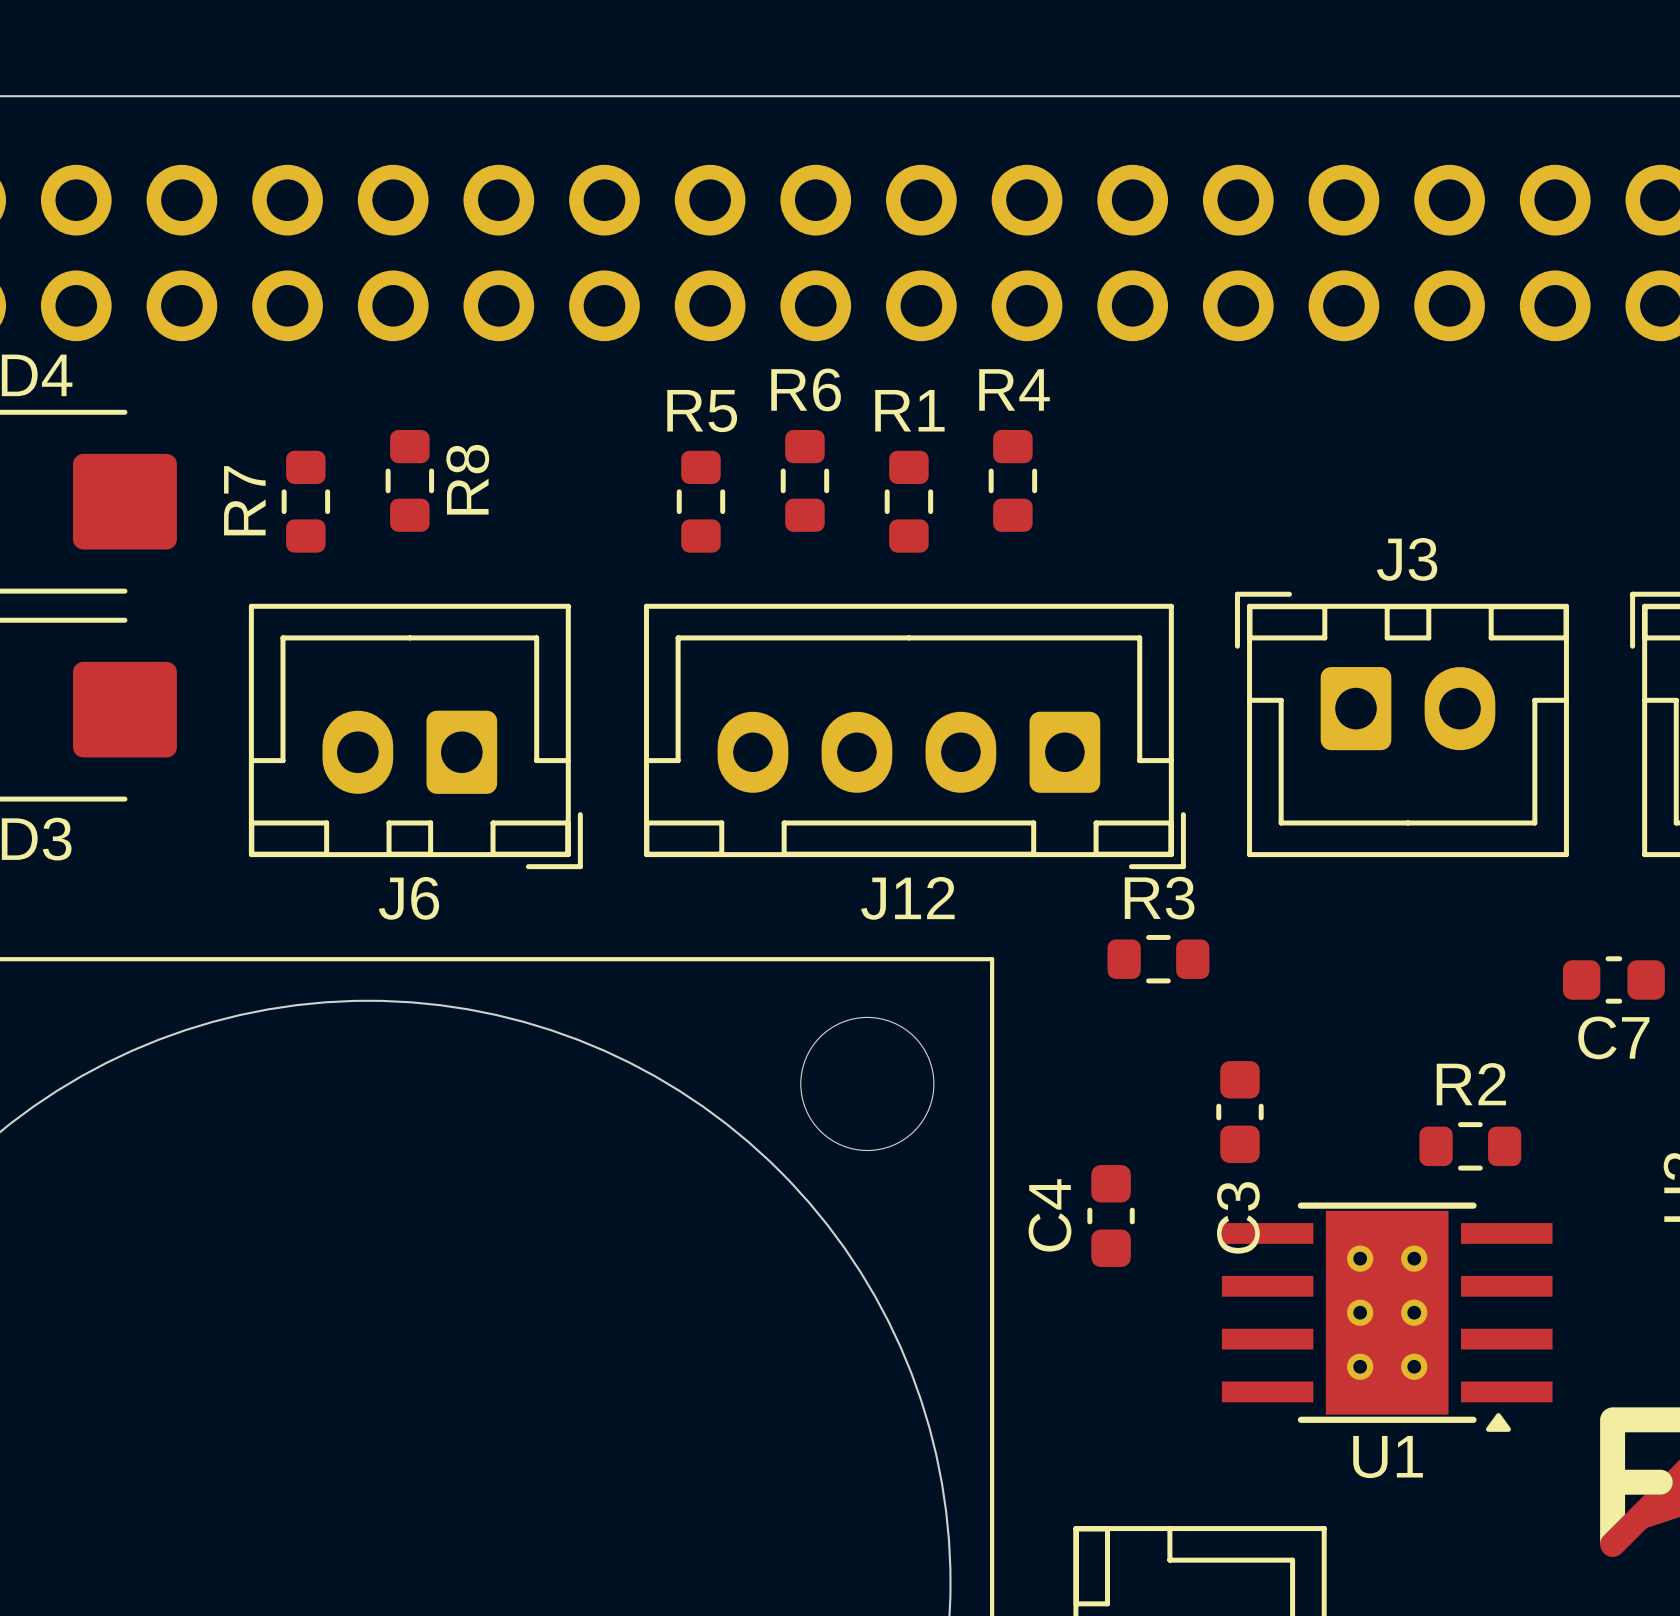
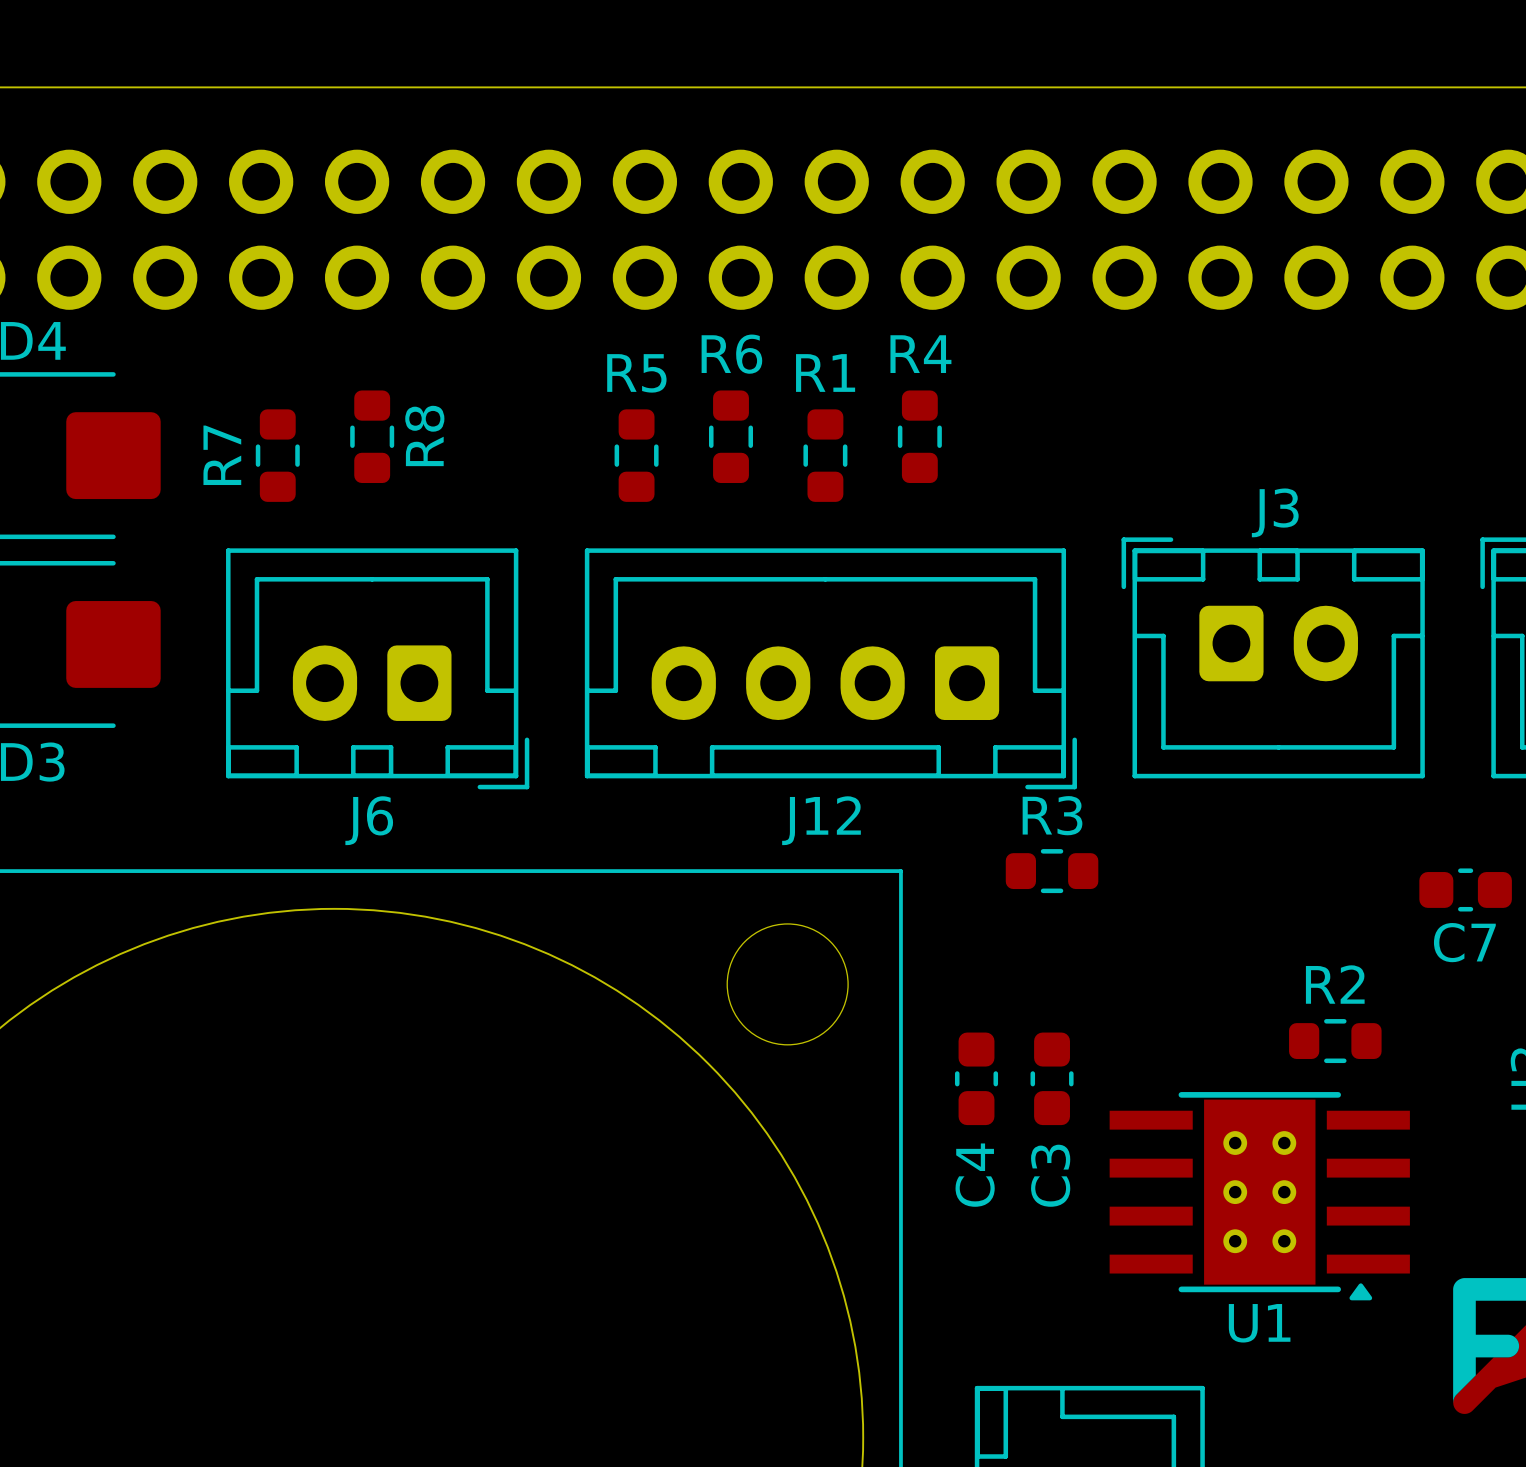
C3 position: (1239, 1112) -> (1052, 1078)
C4 name position: C4 (1050, 1215) -> C4 (975, 1175)
C4 position: (1111, 1216) -> (976, 1078)

